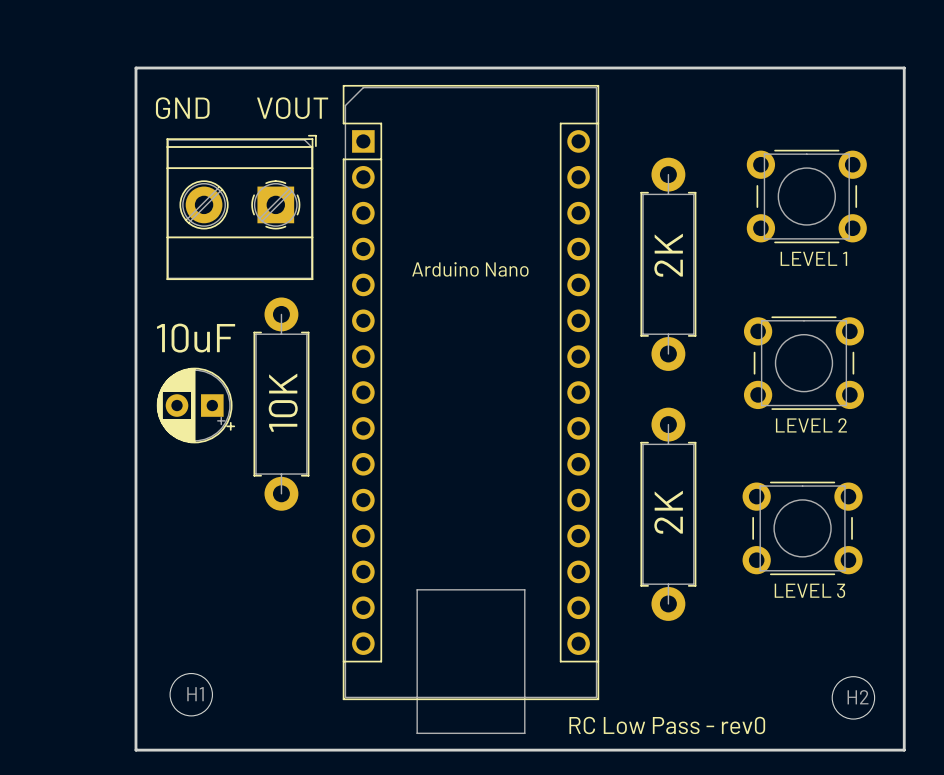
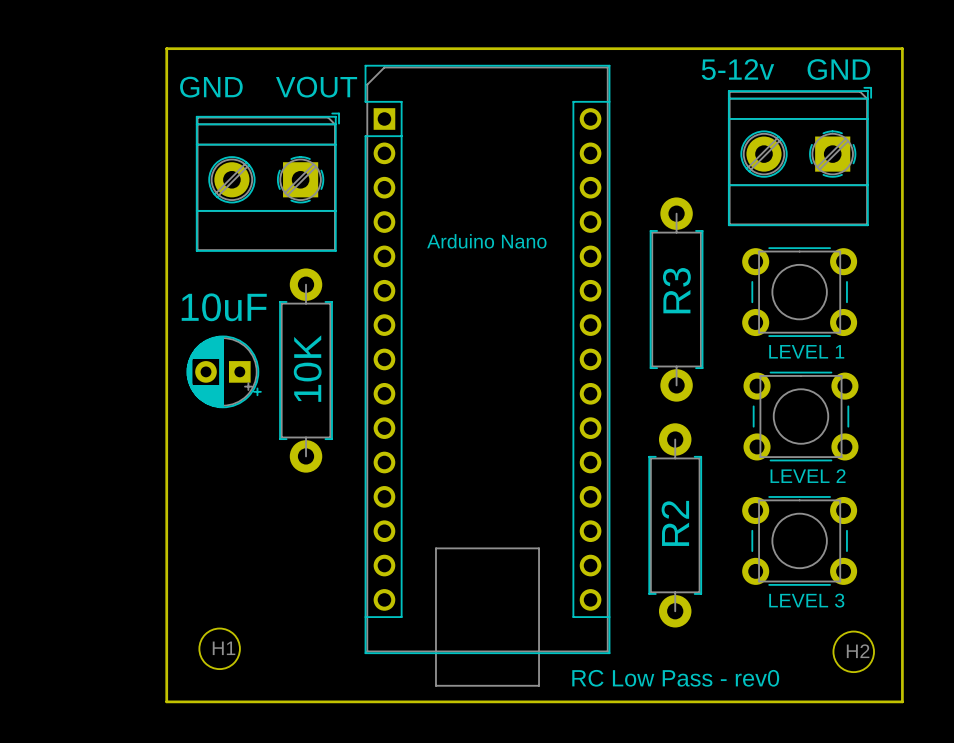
text: none -> 5-12v (737, 69)
text: none -> GND (838, 69)
part: none -> (799, 156)
part position: (806, 196) -> (799, 292)
2K: (668, 264) -> none
R3: none -> (676, 299)
part position: (803, 363) -> (800, 416)
2K: (668, 514) -> none
part position: (802, 528) -> (799, 540)
R2: none -> (675, 525)

